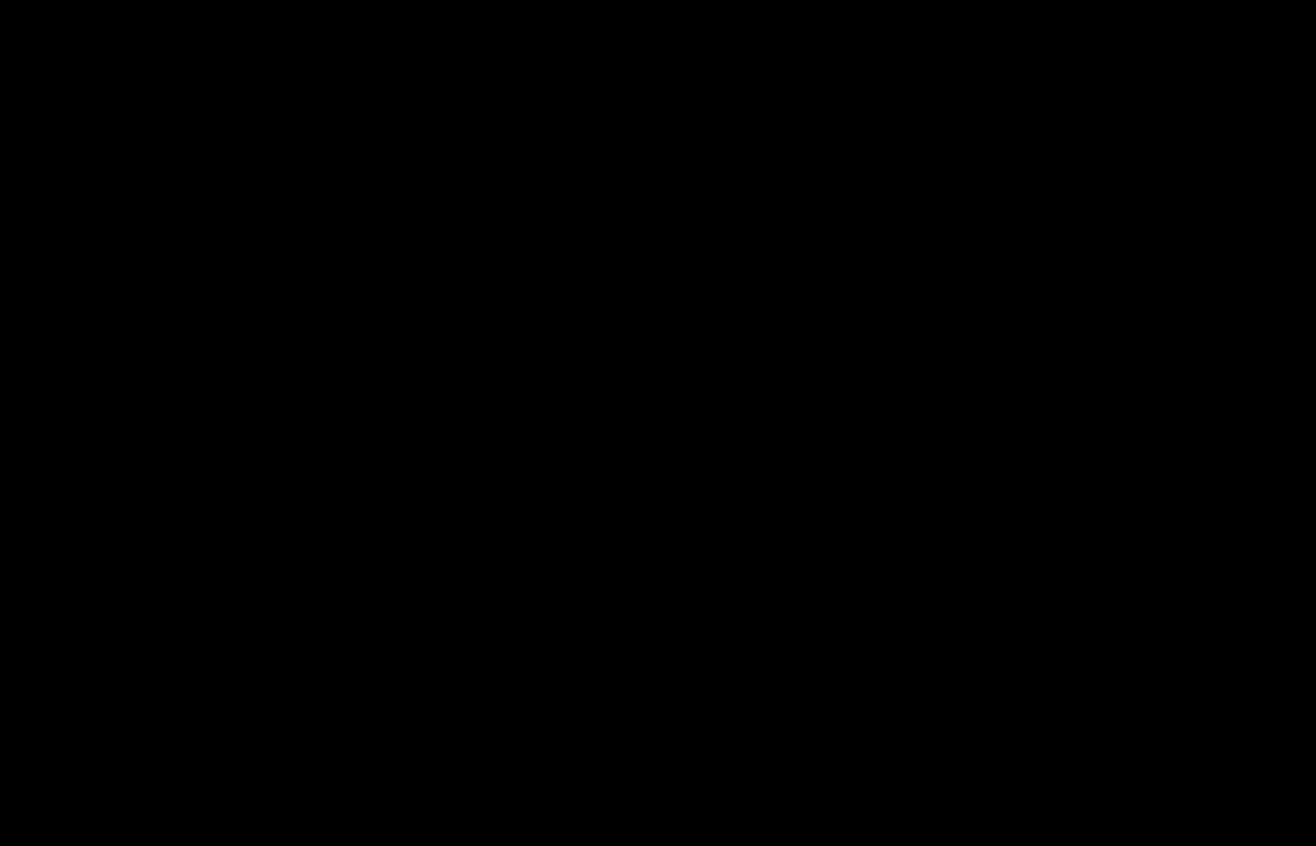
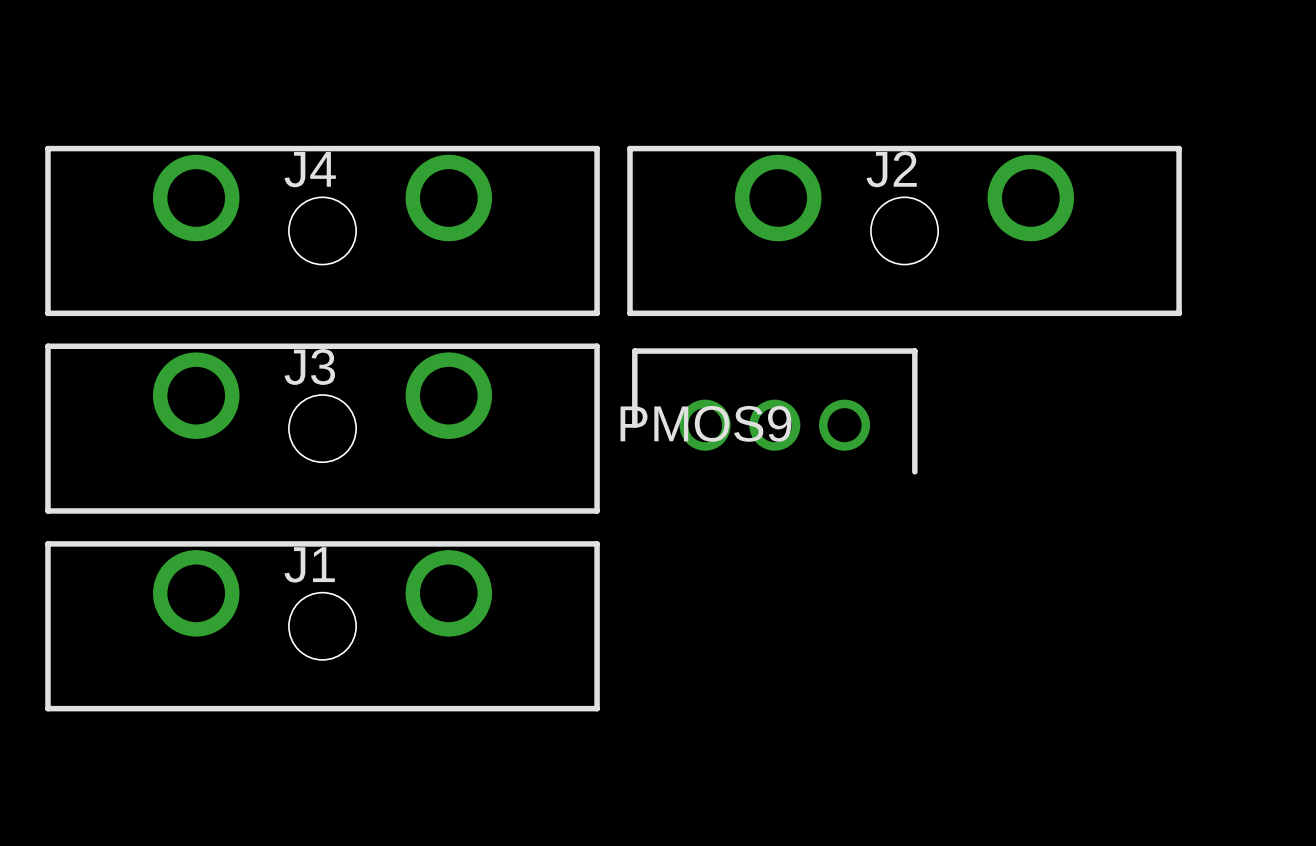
J4: none -> (322, 230)
J2: none -> (904, 230)
PMOS9: none -> (774, 411)
J3: none -> (322, 428)
J1: none -> (322, 626)

